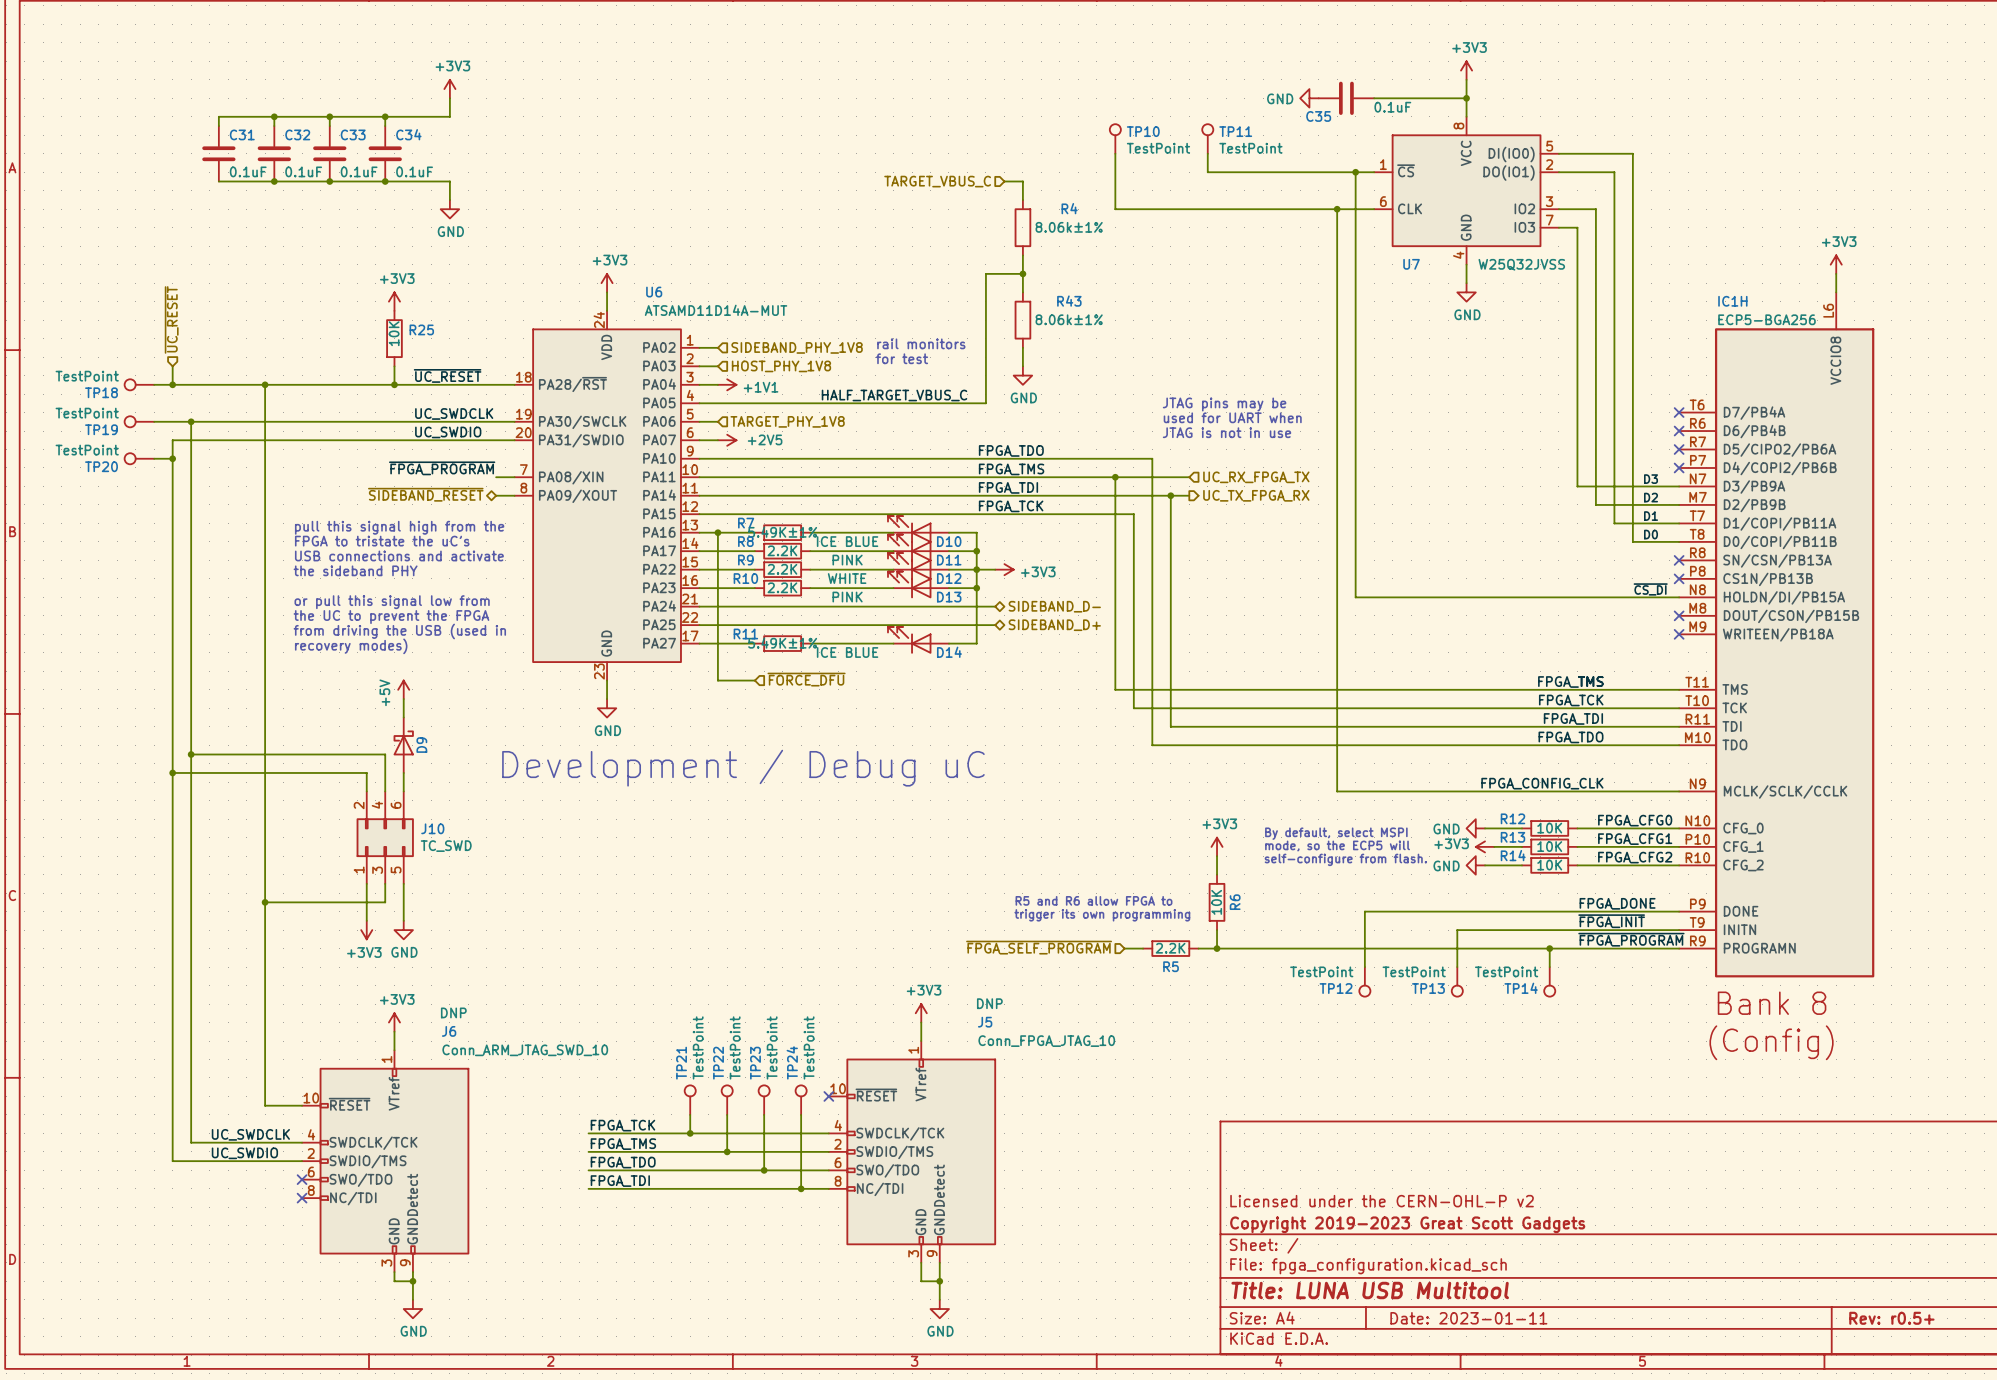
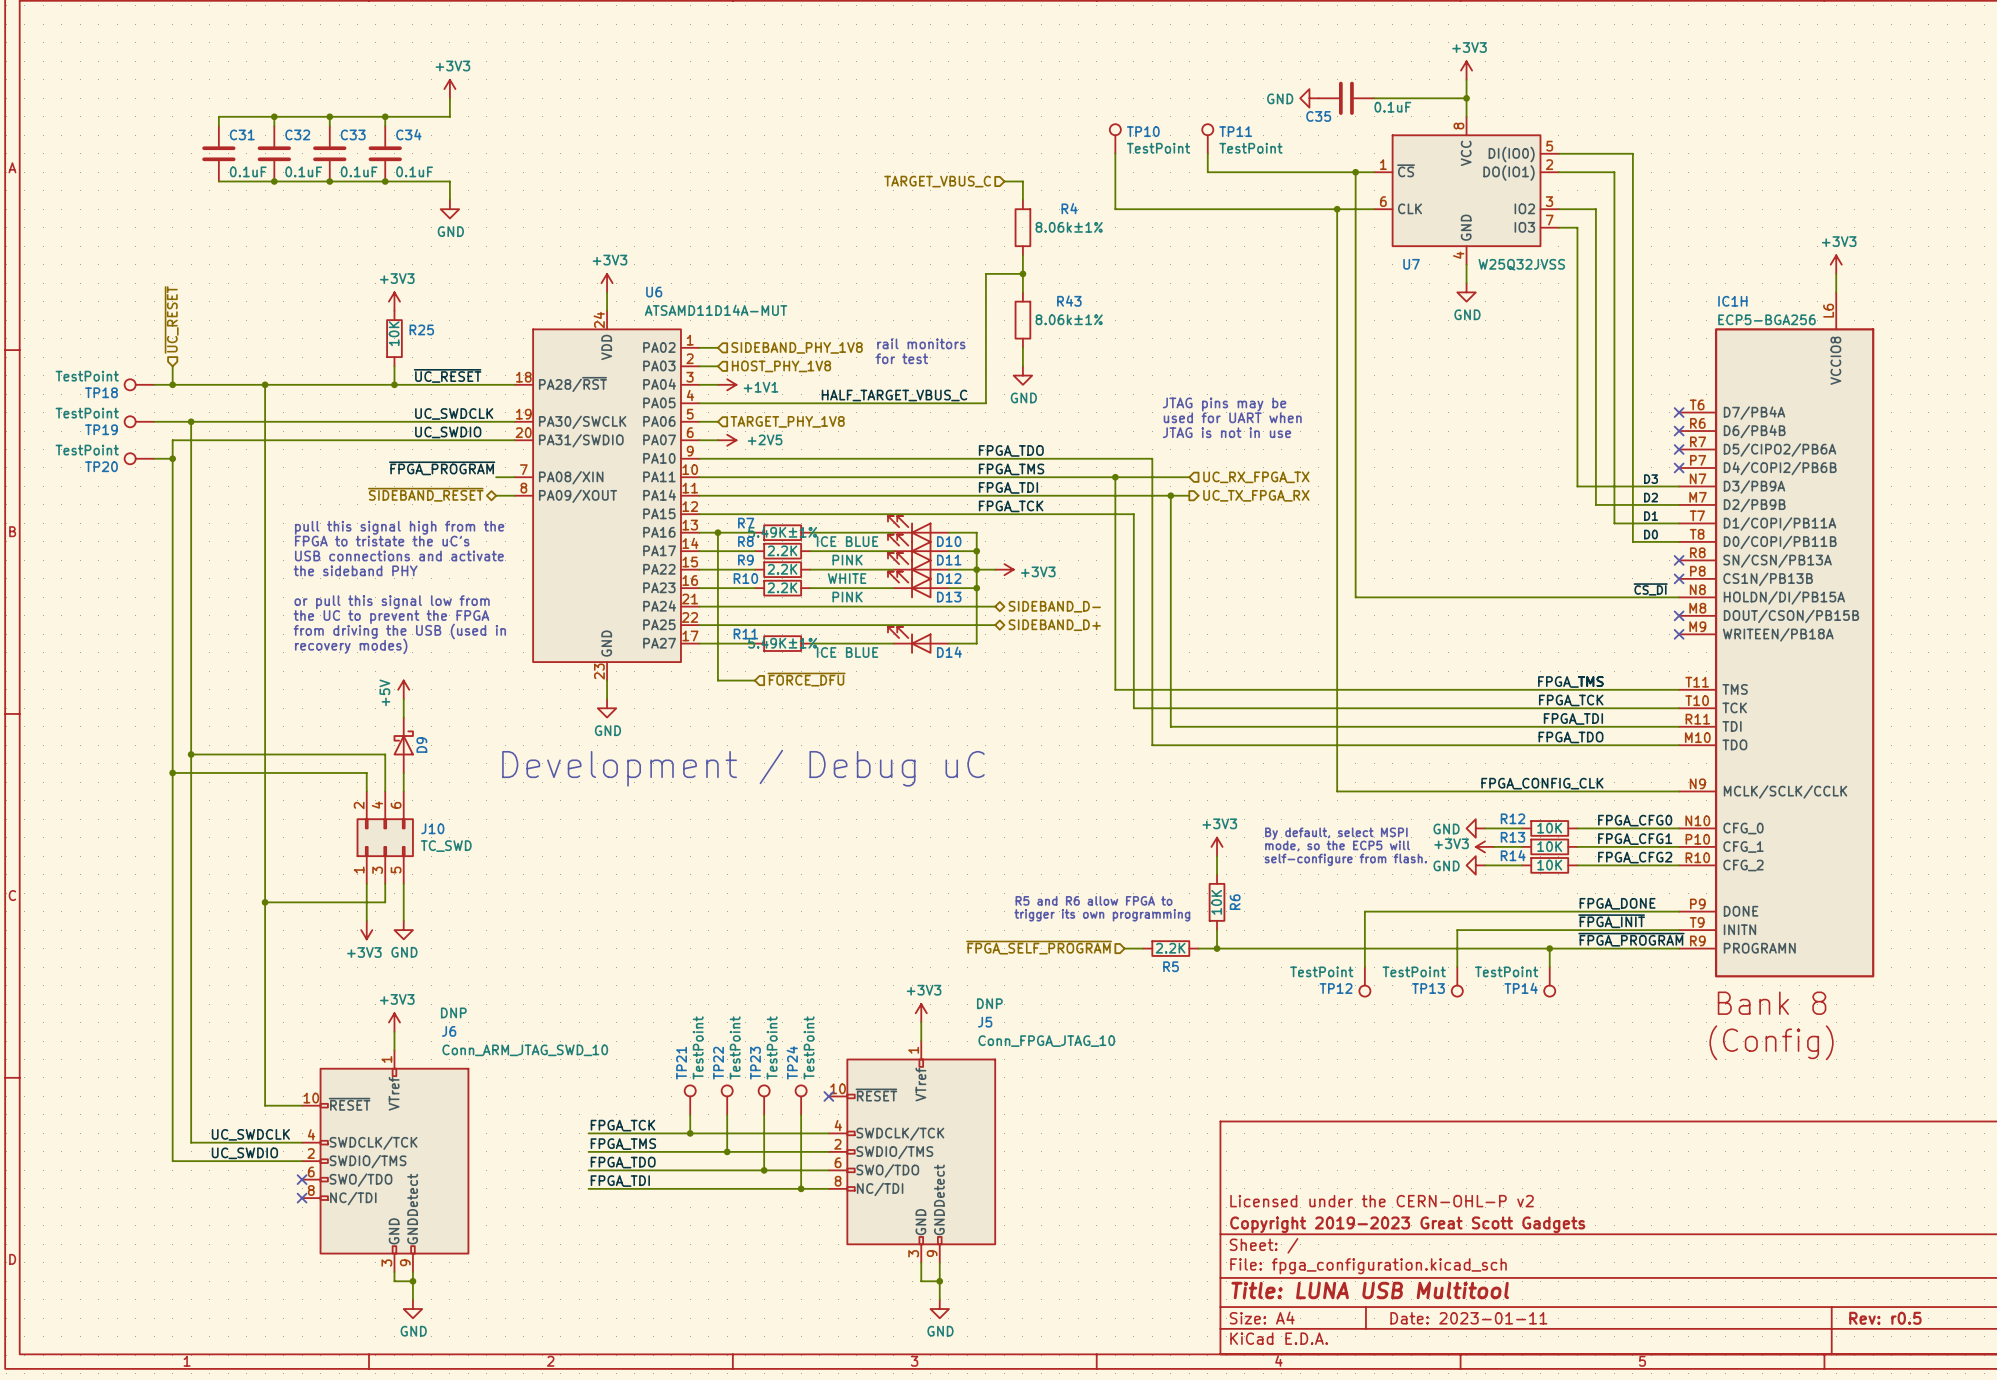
title block: Rev: r0.5+ (1891, 1318) -> Rev: r0.5 (1885, 1318)

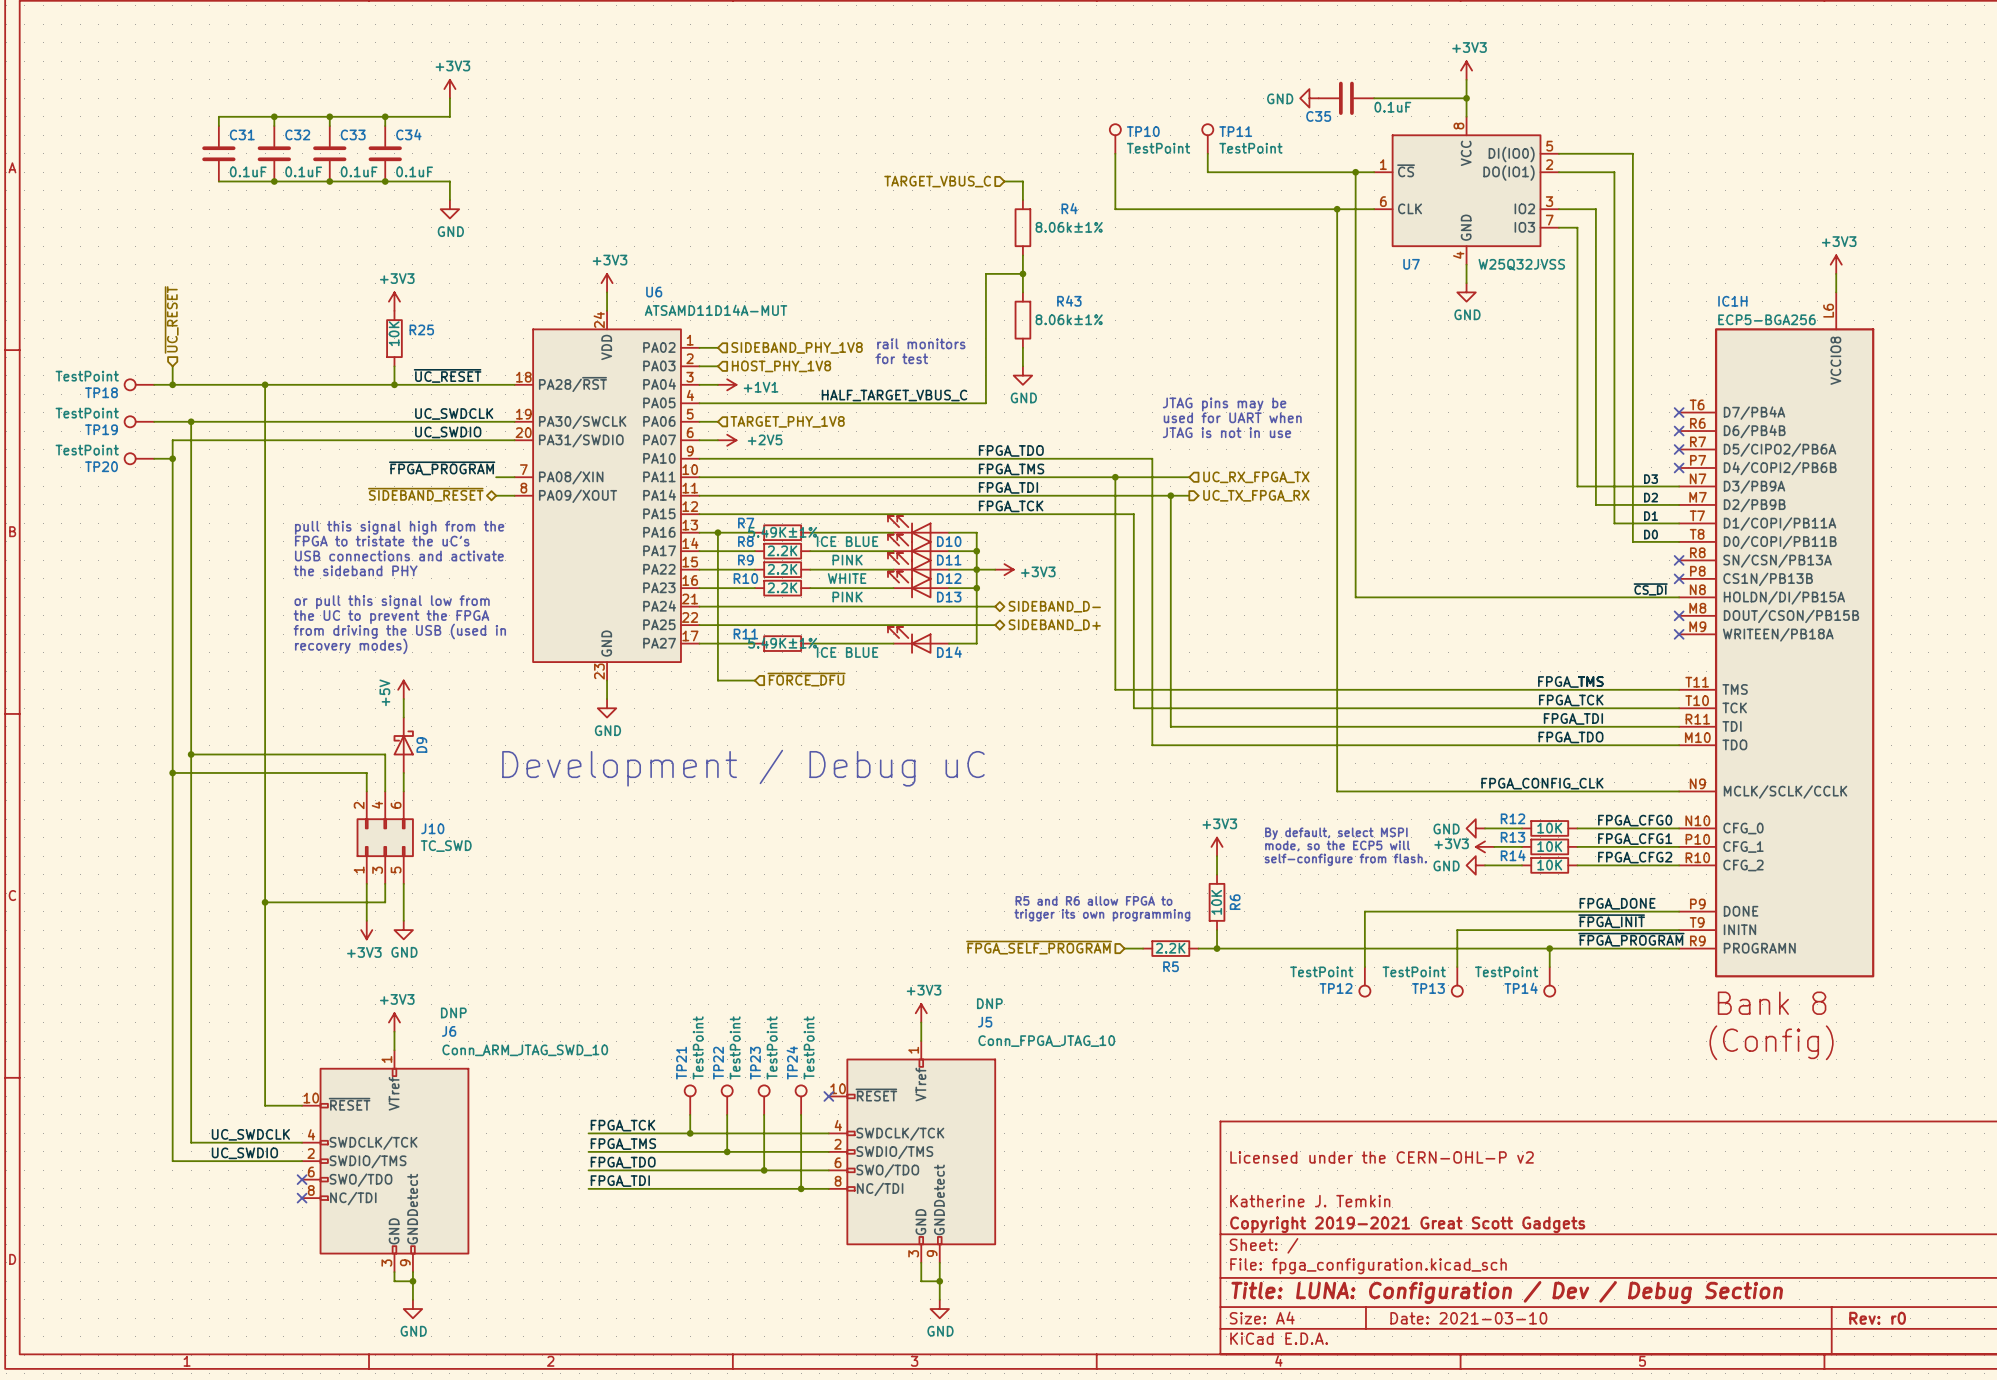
title block: none -> Licensed under the CERN-OHL-P v2 (1382, 1157)
title block: Licensed under the CERN-OHL-P v2 (1382, 1201) -> Katherine J. Temkin (1310, 1201)
title block: Copyright 2019-2023 Great Scott Gadgets (1407, 1224) -> Copyright 2019-2021 Great Scott Gadgets (1407, 1224)
title block: Title: LUNA USB Multitool (1370, 1290) -> Title: LUNA: Configuration / Dev / Debug Section (1507, 1292)
title block: Date: 2023-01-11 (1468, 1318) -> Date: 2021-03-10 (1468, 1318)
title block: Rev: r0.5 (1885, 1318) -> Rev: r0 (1877, 1318)

